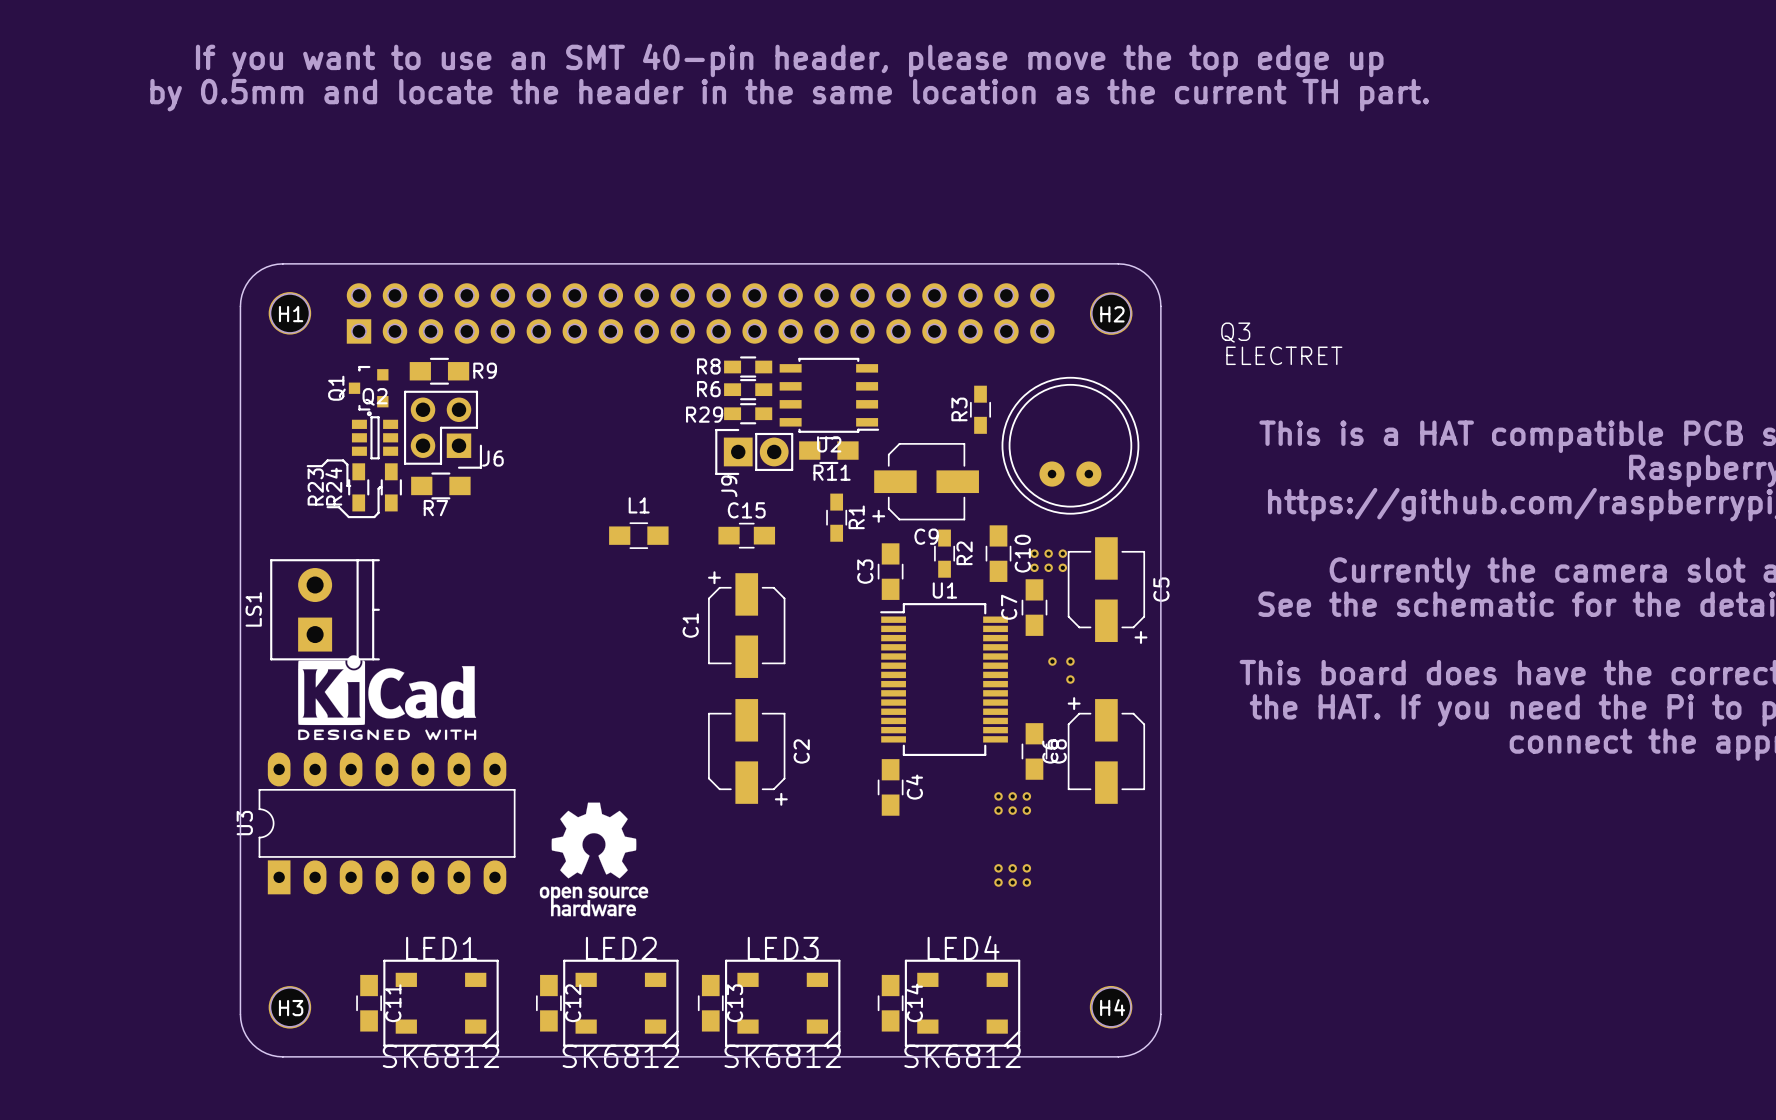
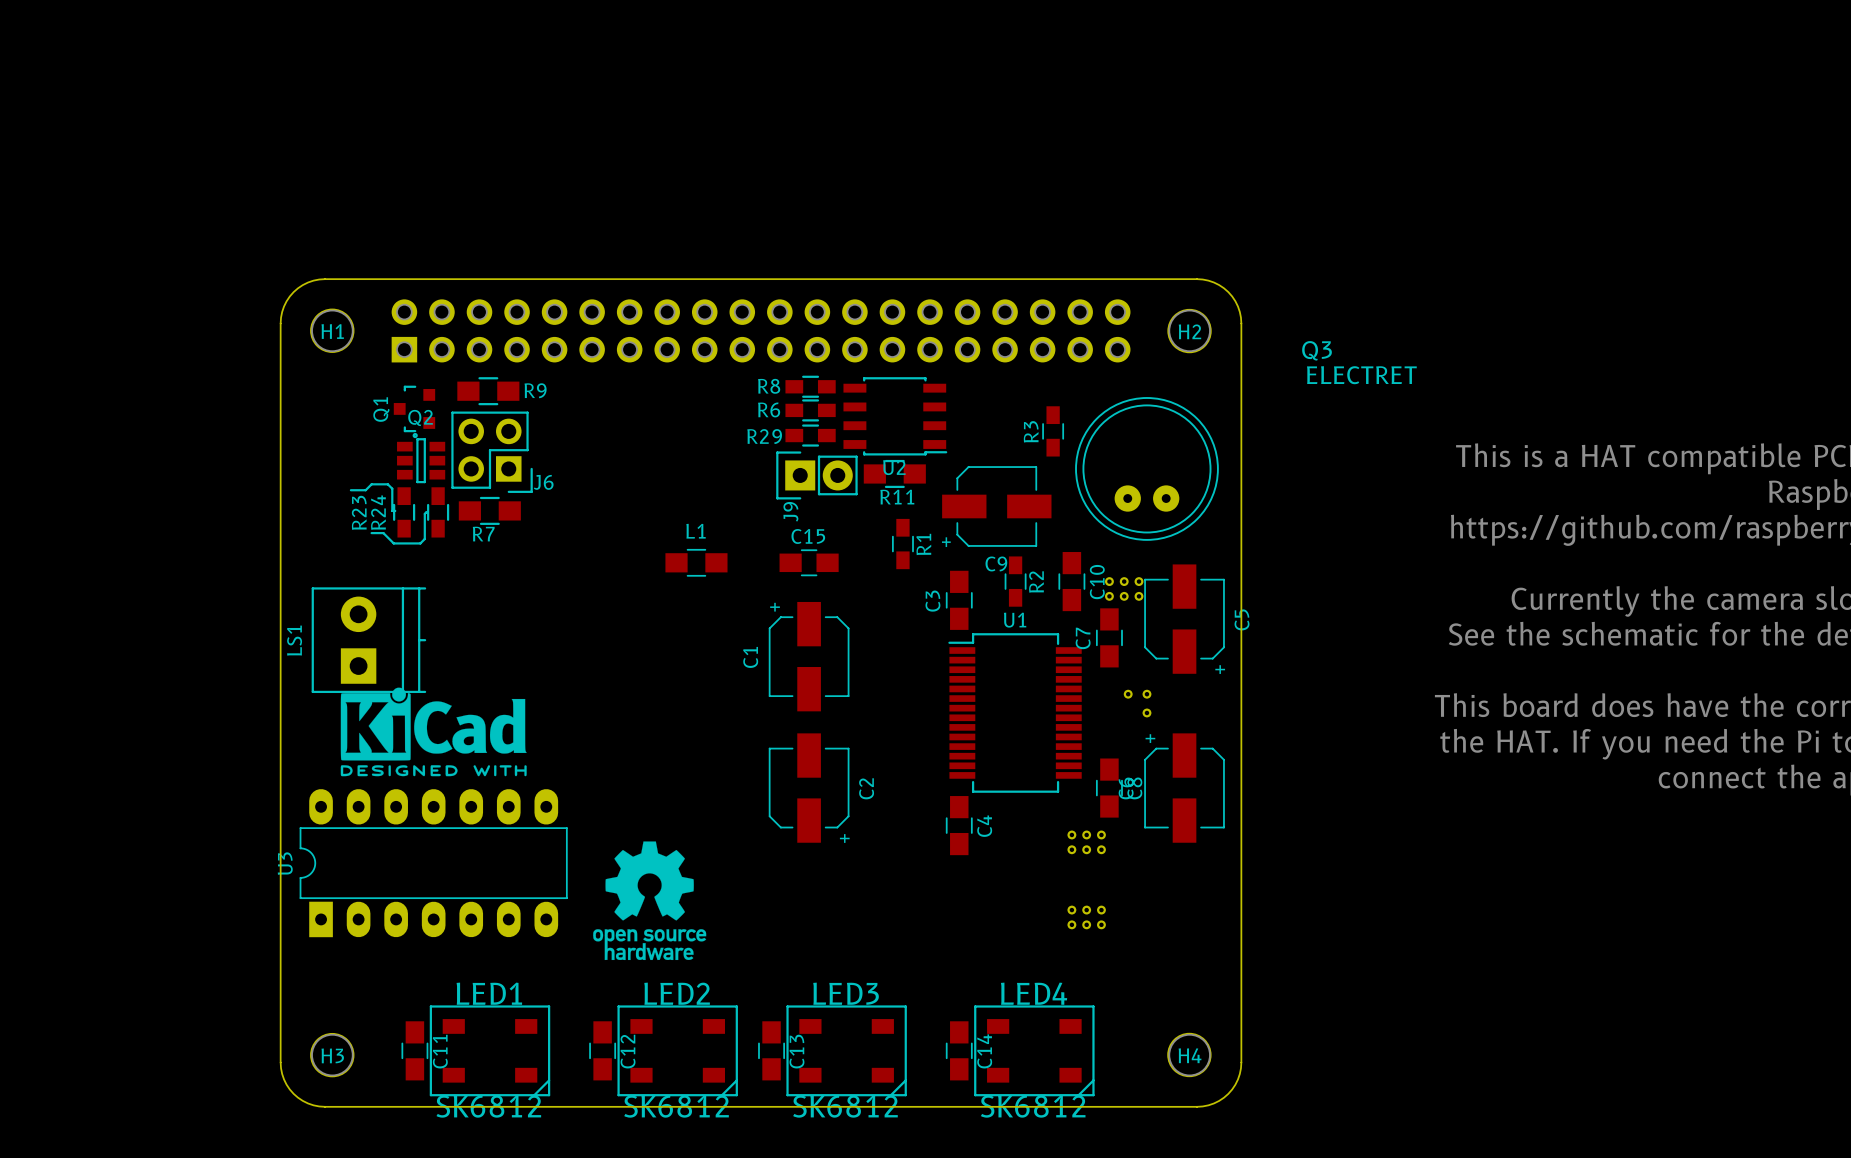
text: If you want to use an SMT 40-pin header, please move the top edge up (789, 60) -> none
text: by 0.5mm and locate the header in the same location as the current TH part. (789, 95) -> none

